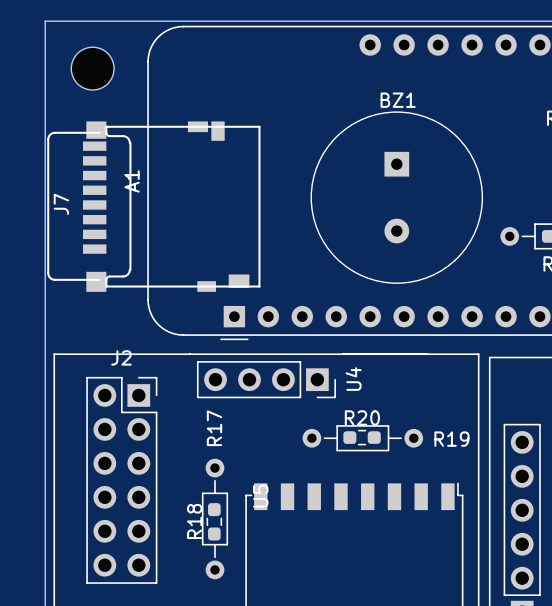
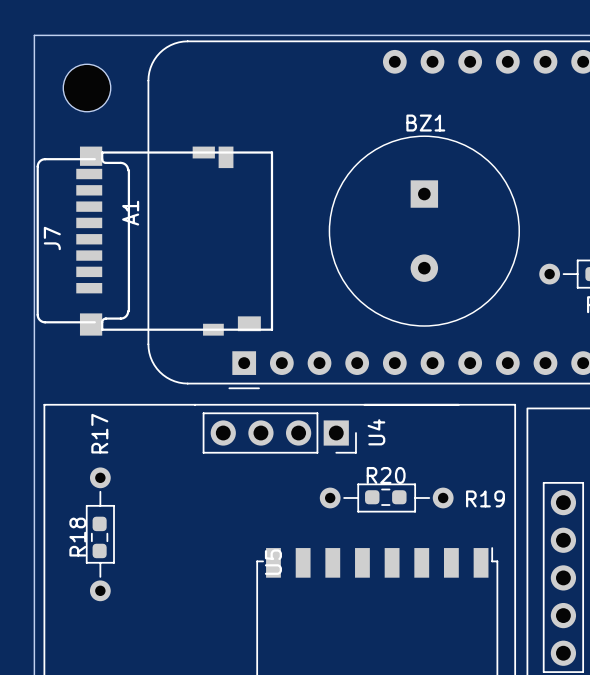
J2: (121, 480) -> none
R17 position: (215, 518) -> (100, 534)
R18 position: (214, 521) -> (99, 537)

